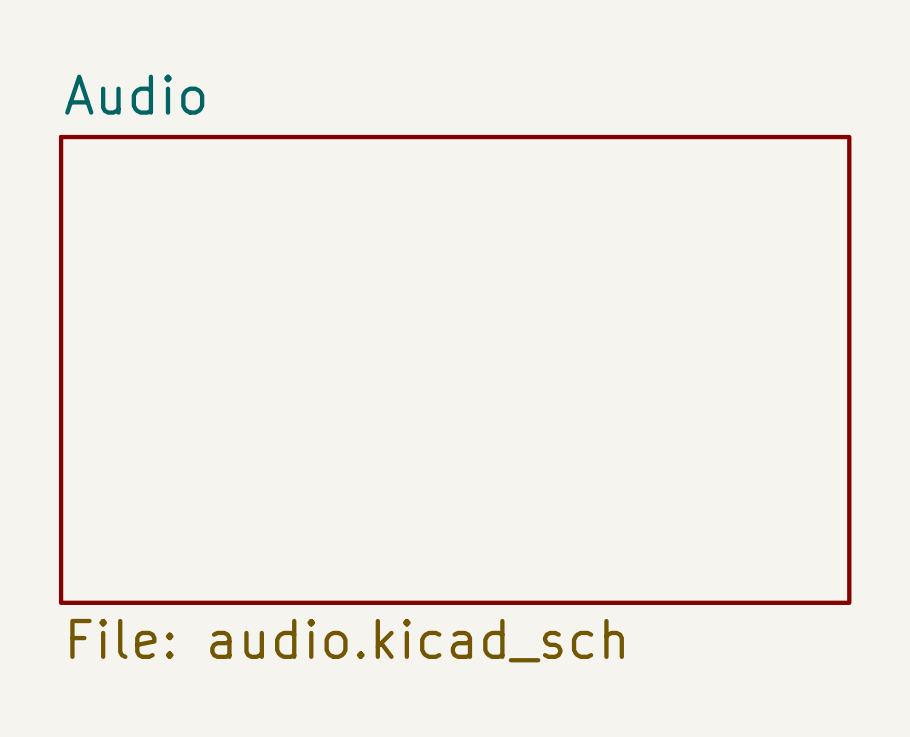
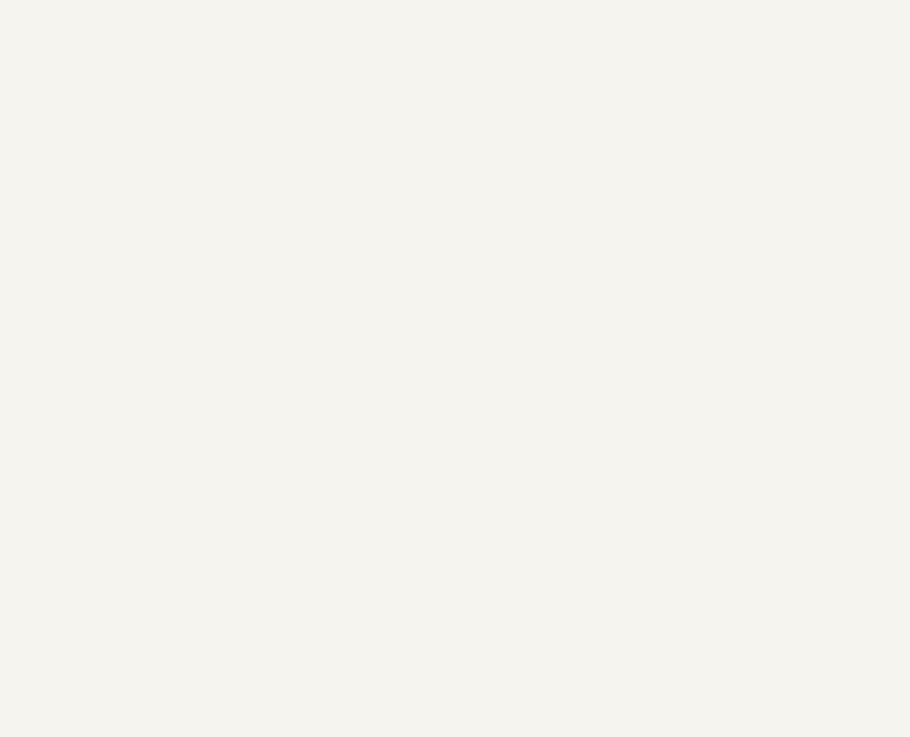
sheet Audio: File: audio.kicad_sch (455, 369) -> none

